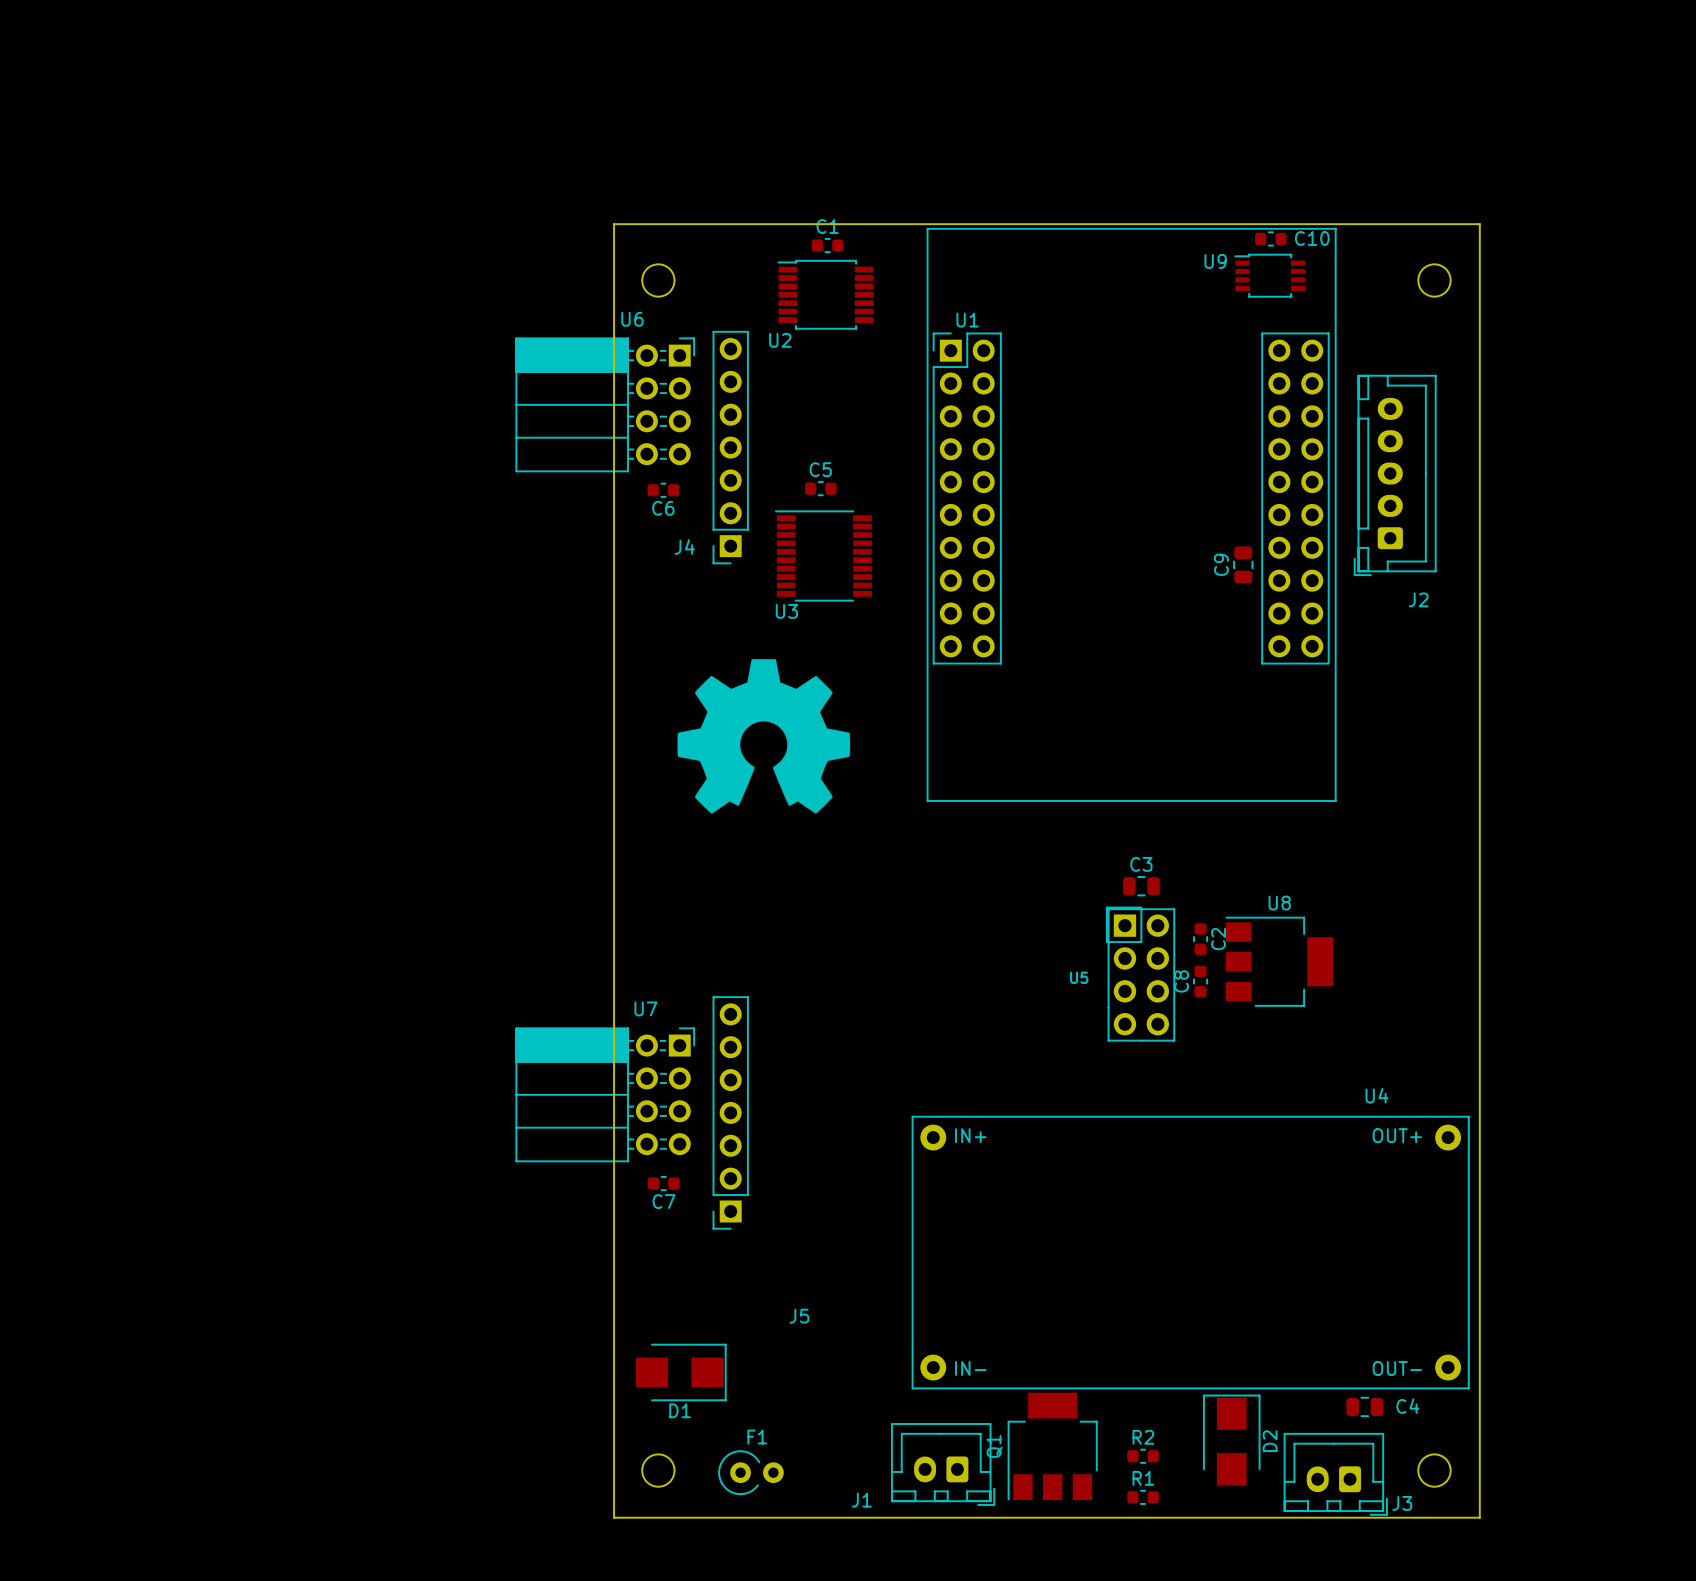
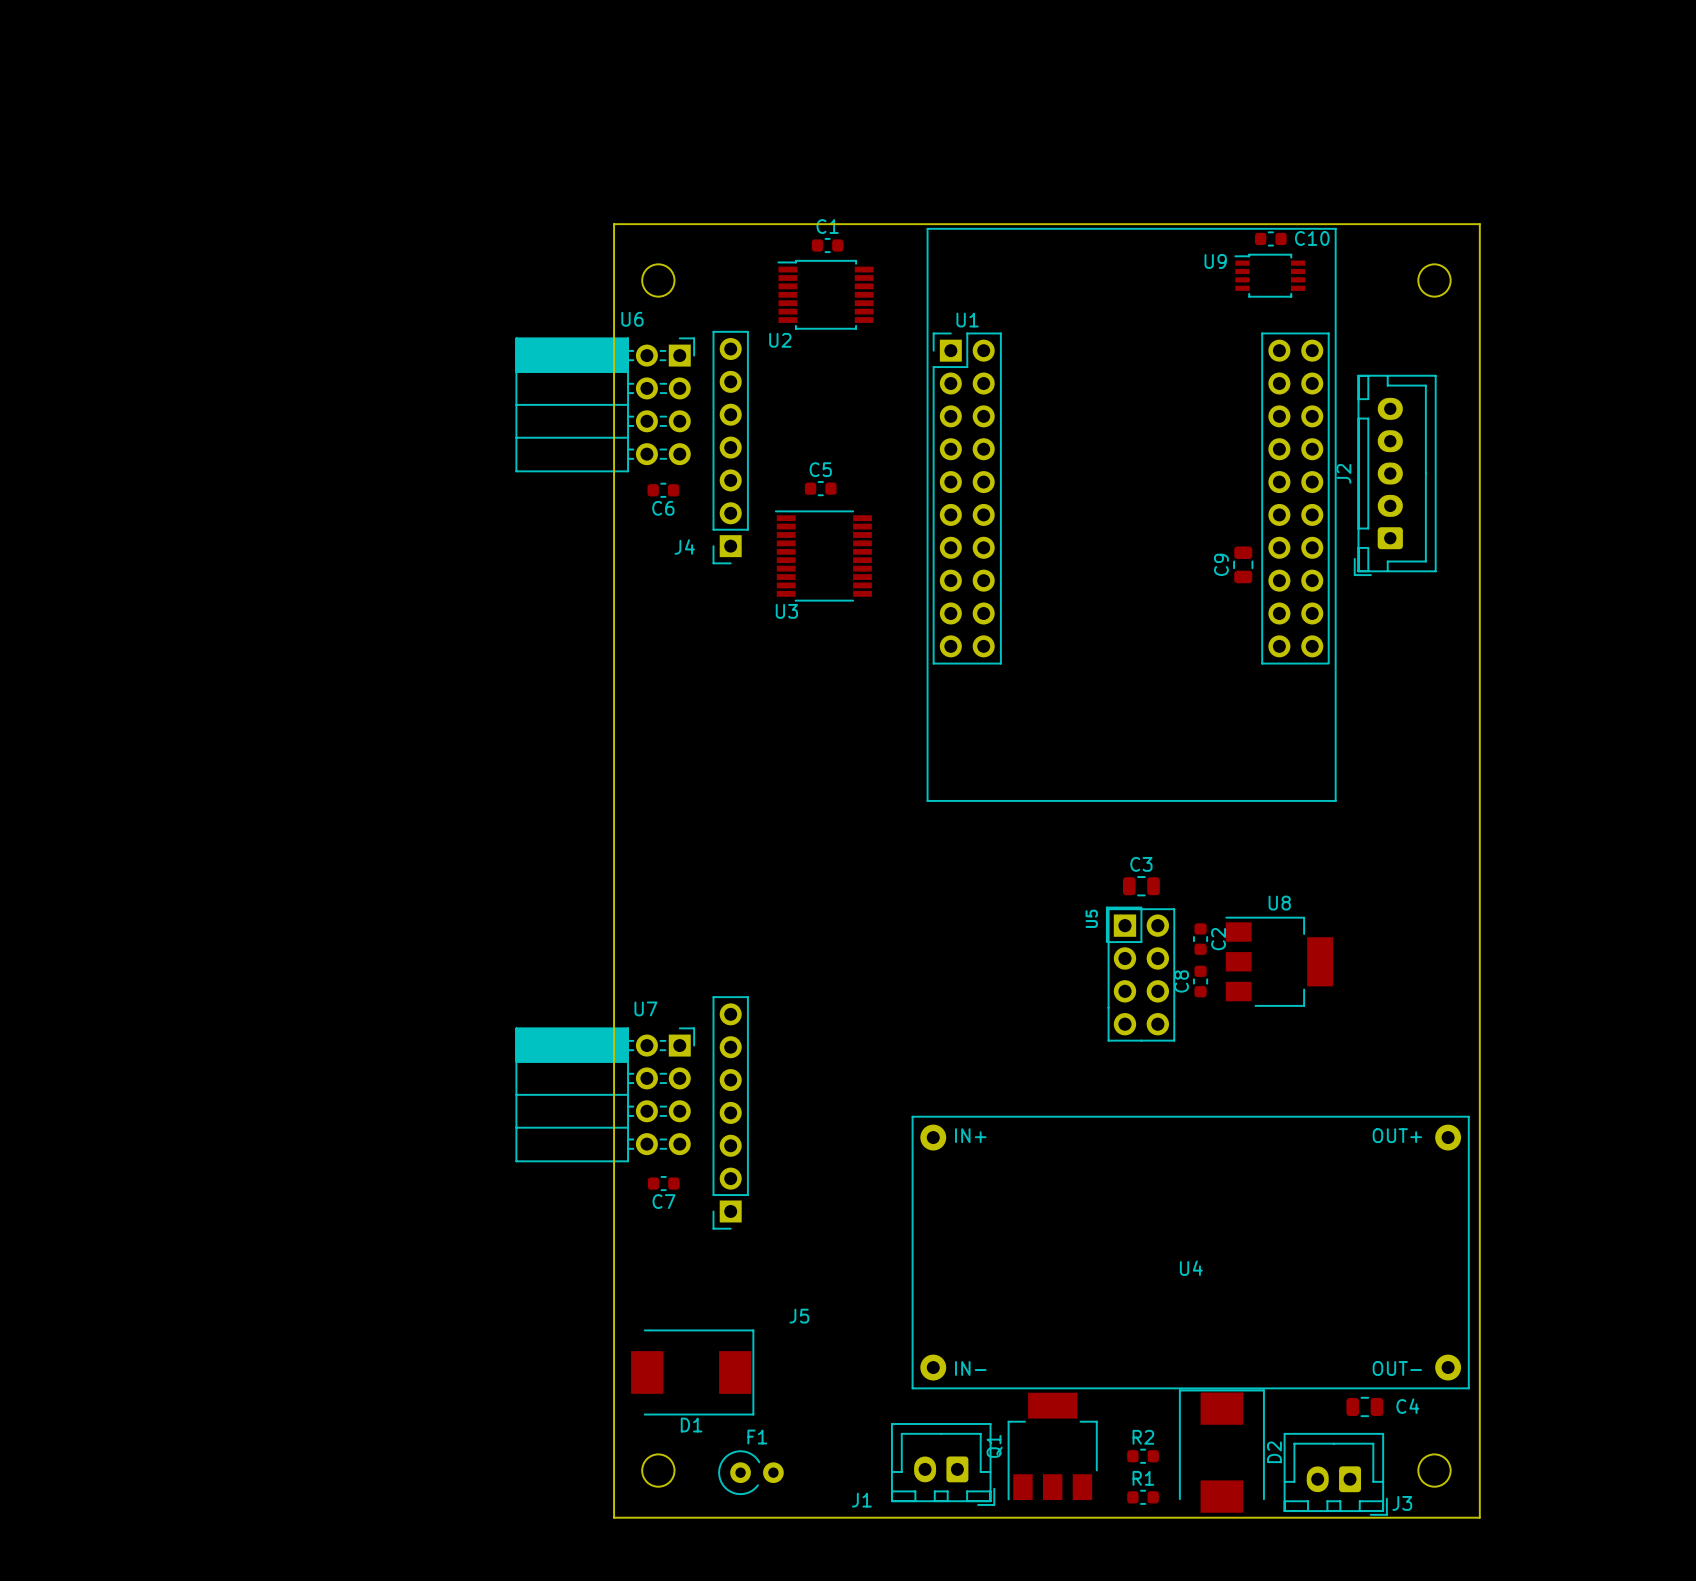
J2 name rotation: 0° (1418, 599) -> 90° counterclockwise (1343, 473)
J2 name position: J2 (1418, 599) -> J2 (1343, 473)
drawing: [677, 659, 851, 814] -> none
U5 name rotation: 0° (1079, 977) -> 90° counterclockwise (1091, 918)
U5 name position: U5 (1079, 977) -> U5 (1091, 918)
U4 name position: U4 (1376, 1095) -> U4 (1191, 1268)
D1 footprint: [635, 1343, 727, 1402] -> [631, 1329, 755, 1416]
D2 footprint: [1203, 1394, 1261, 1486] -> [1179, 1389, 1265, 1513]

